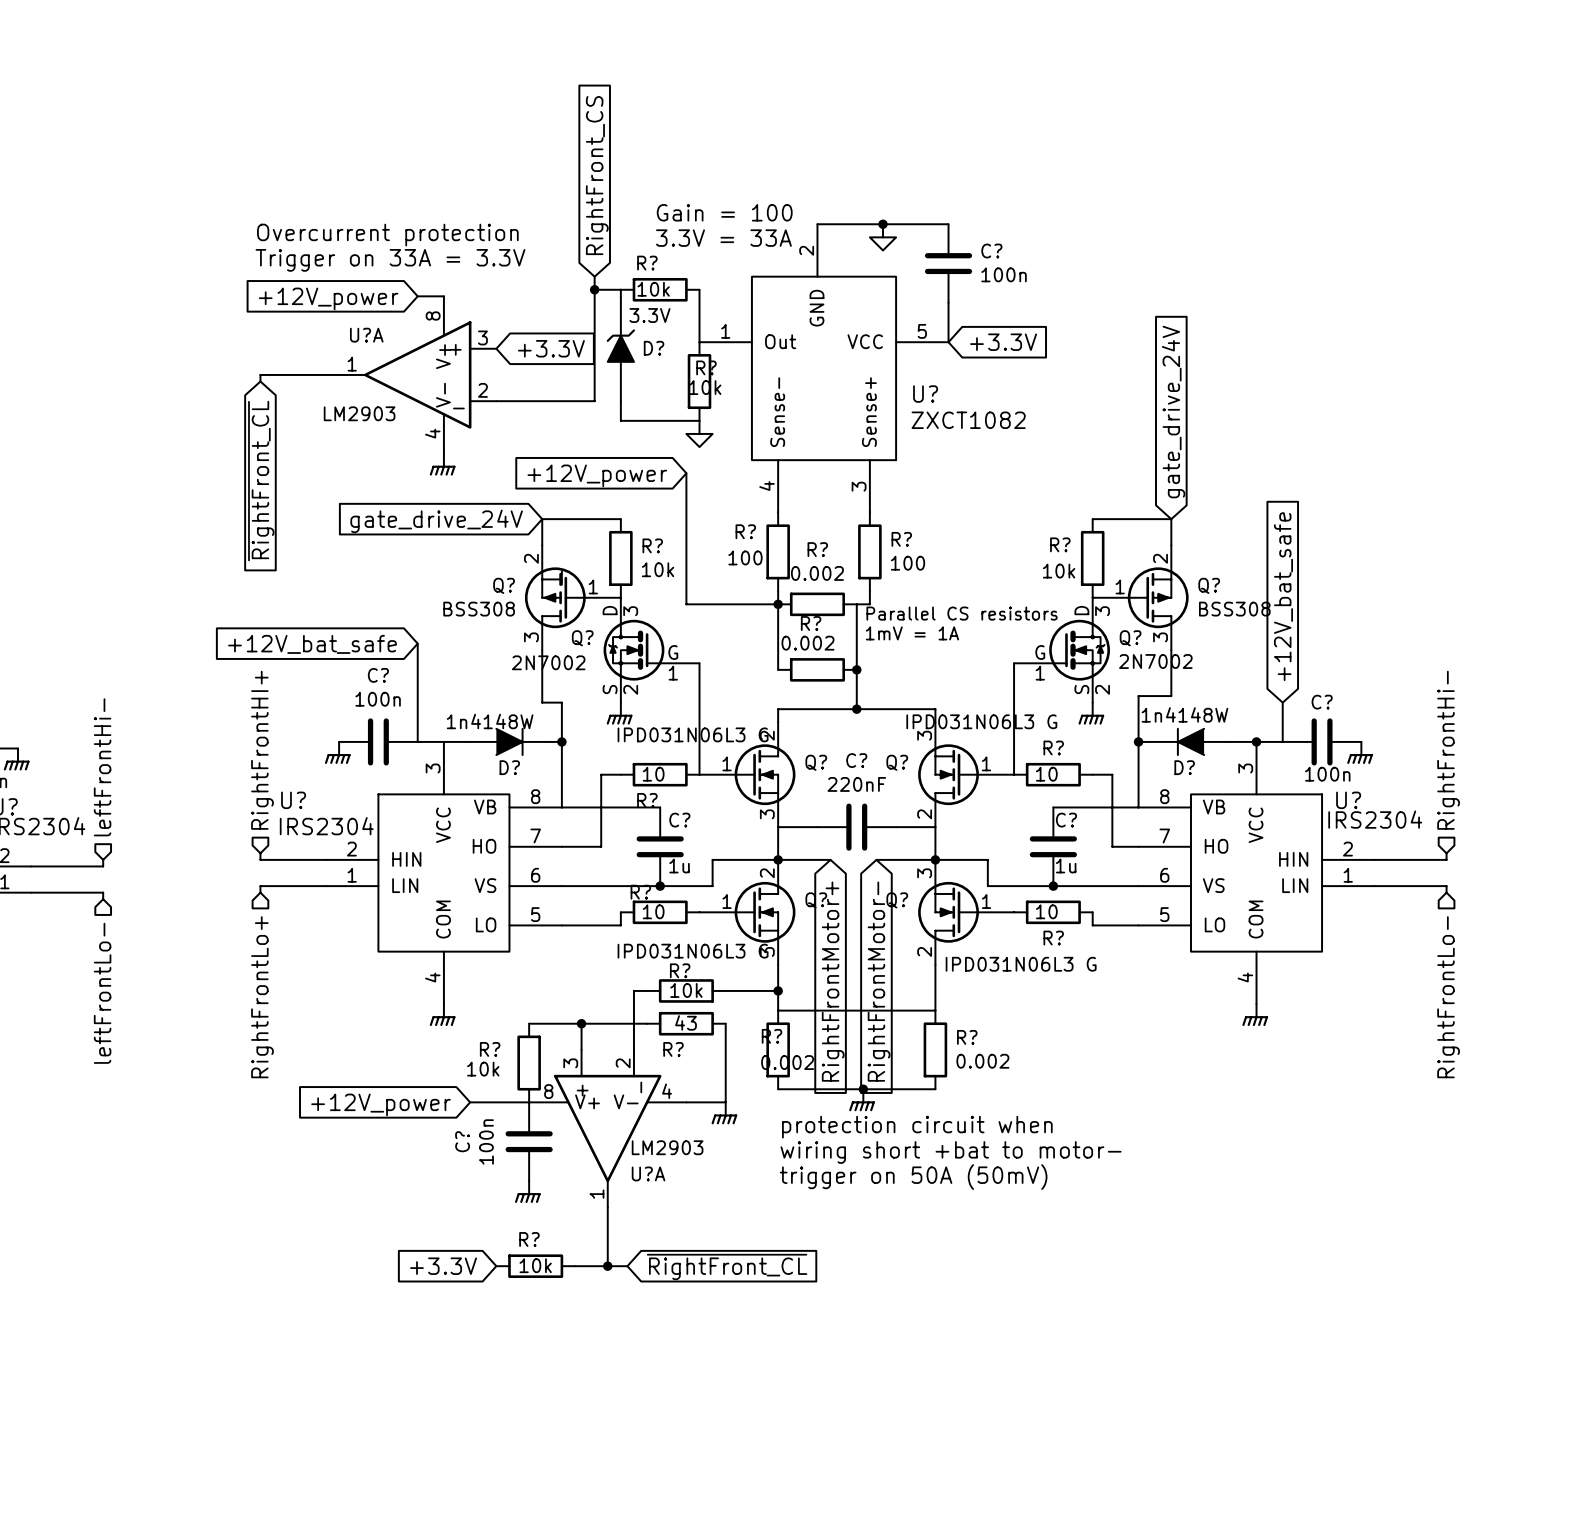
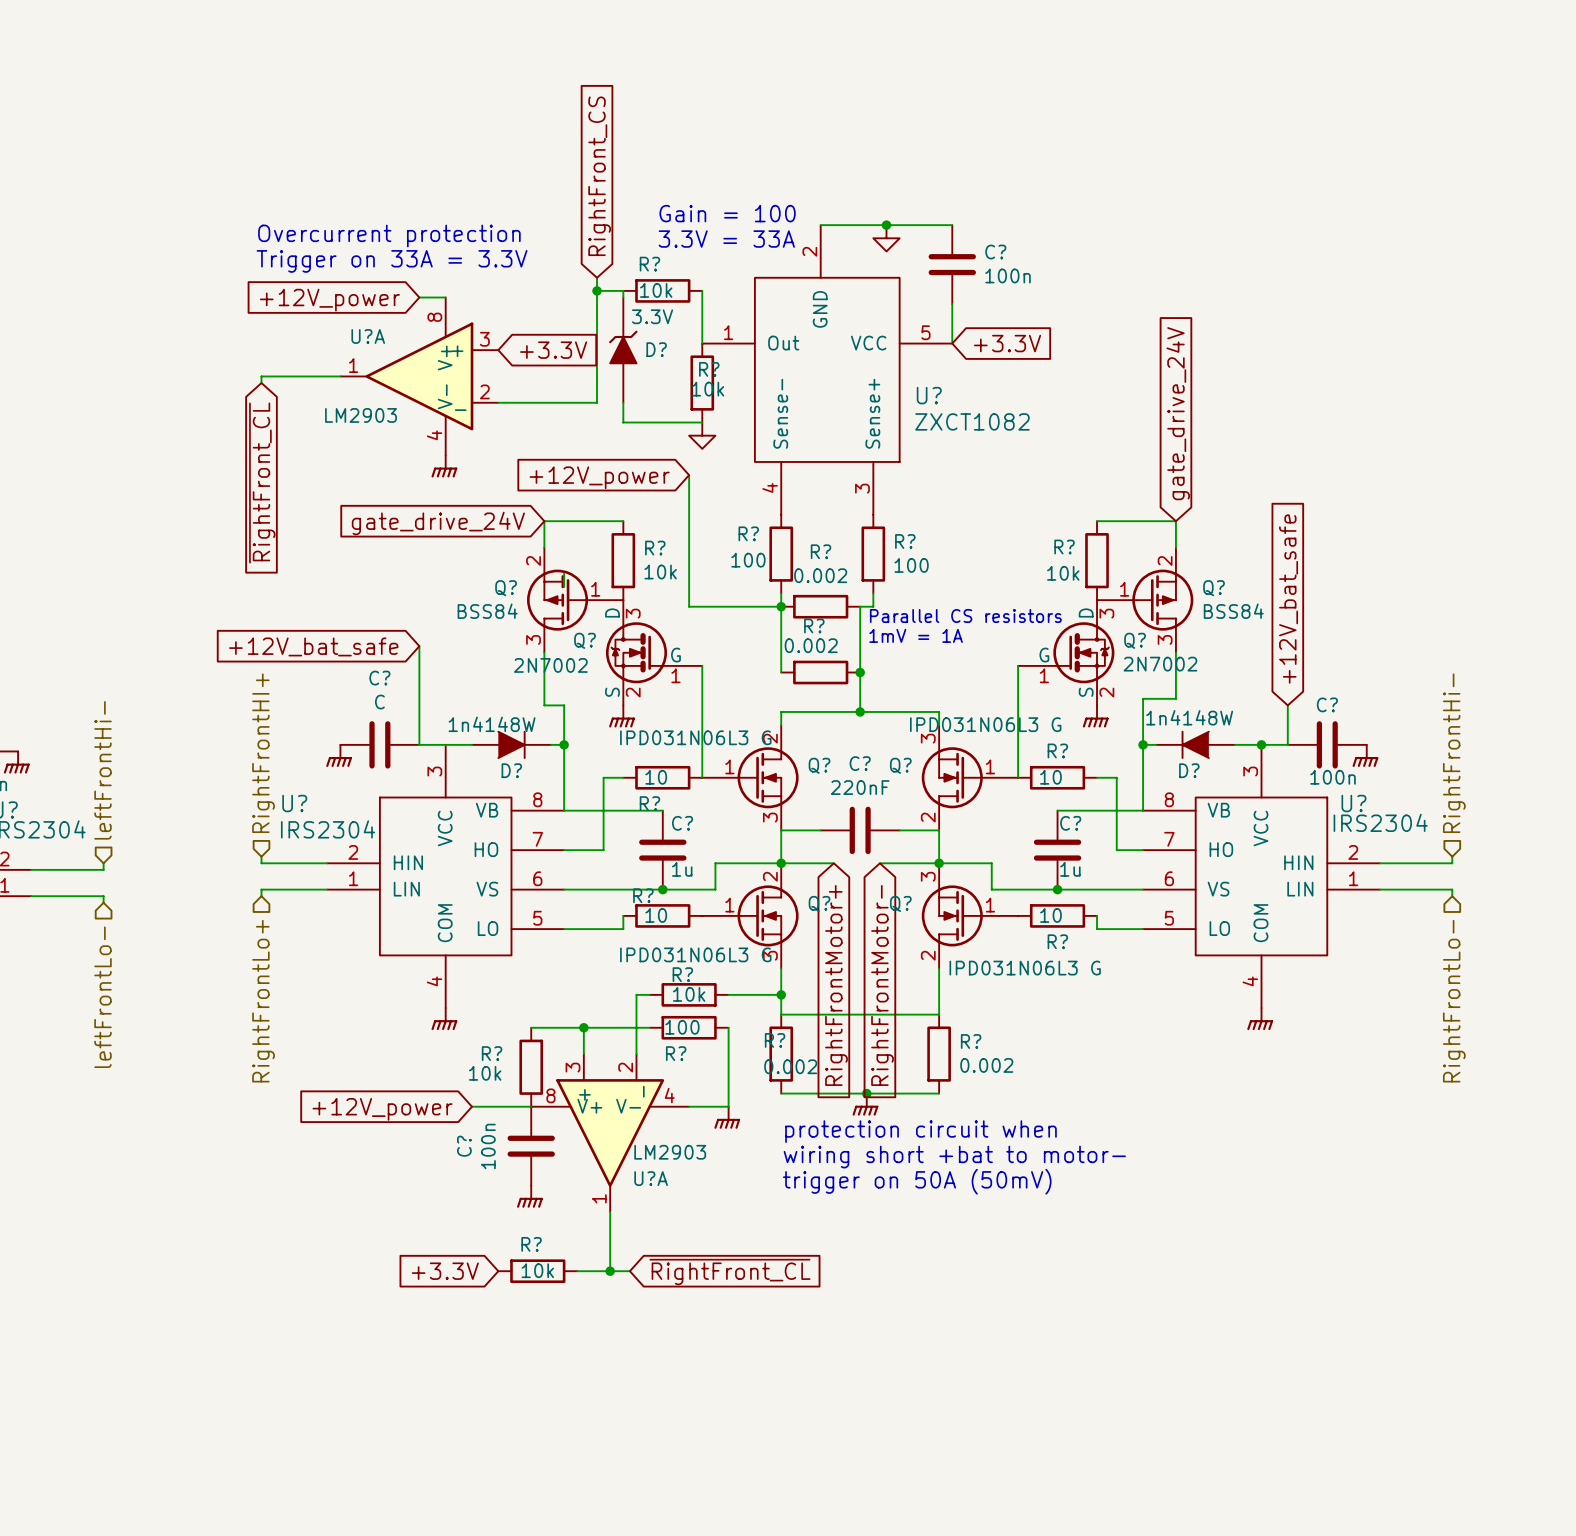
Q? value: BSS308 (479, 609) -> BSS84 (487, 611)
Q? value: BSS308 (1234, 609) -> BSS84 (1233, 611)
C? value: 100n (378, 699) -> C (379, 702)
R? value: 43 (685, 1022) -> 100 (682, 1027)

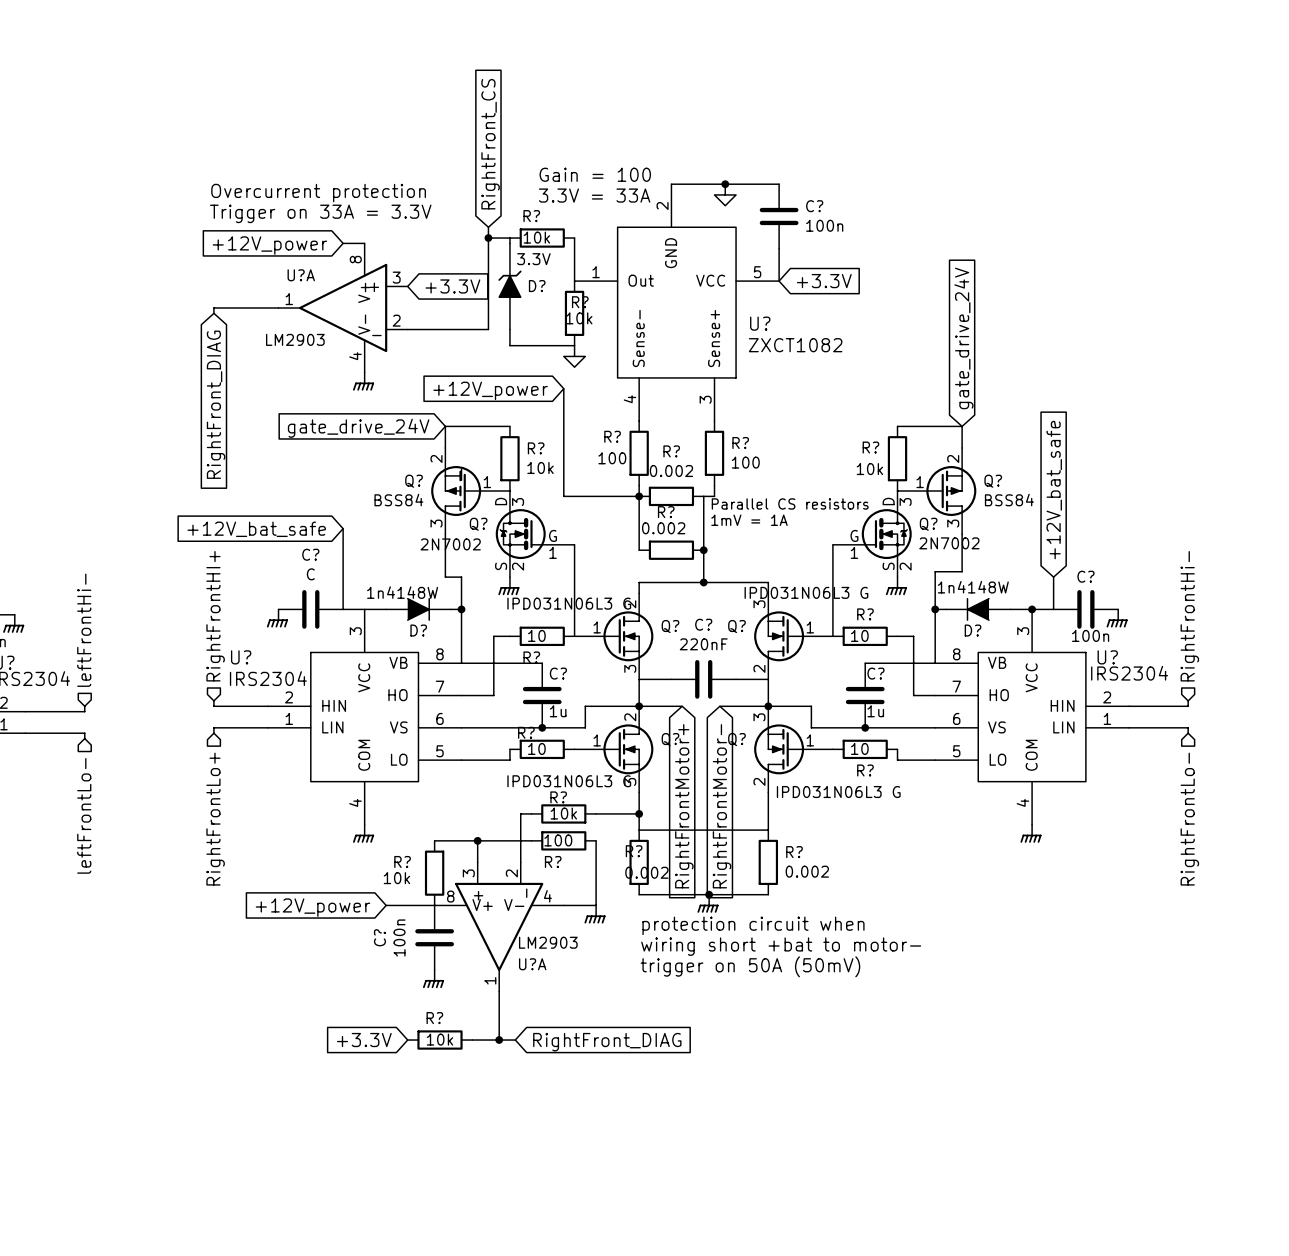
global label: ~{RightFront_CL} (262, 483) -> RightFront_DIAG (216, 404)
global label: ~{RightFront_CL} (729, 1272) -> RightFront_DIAG (607, 1042)

